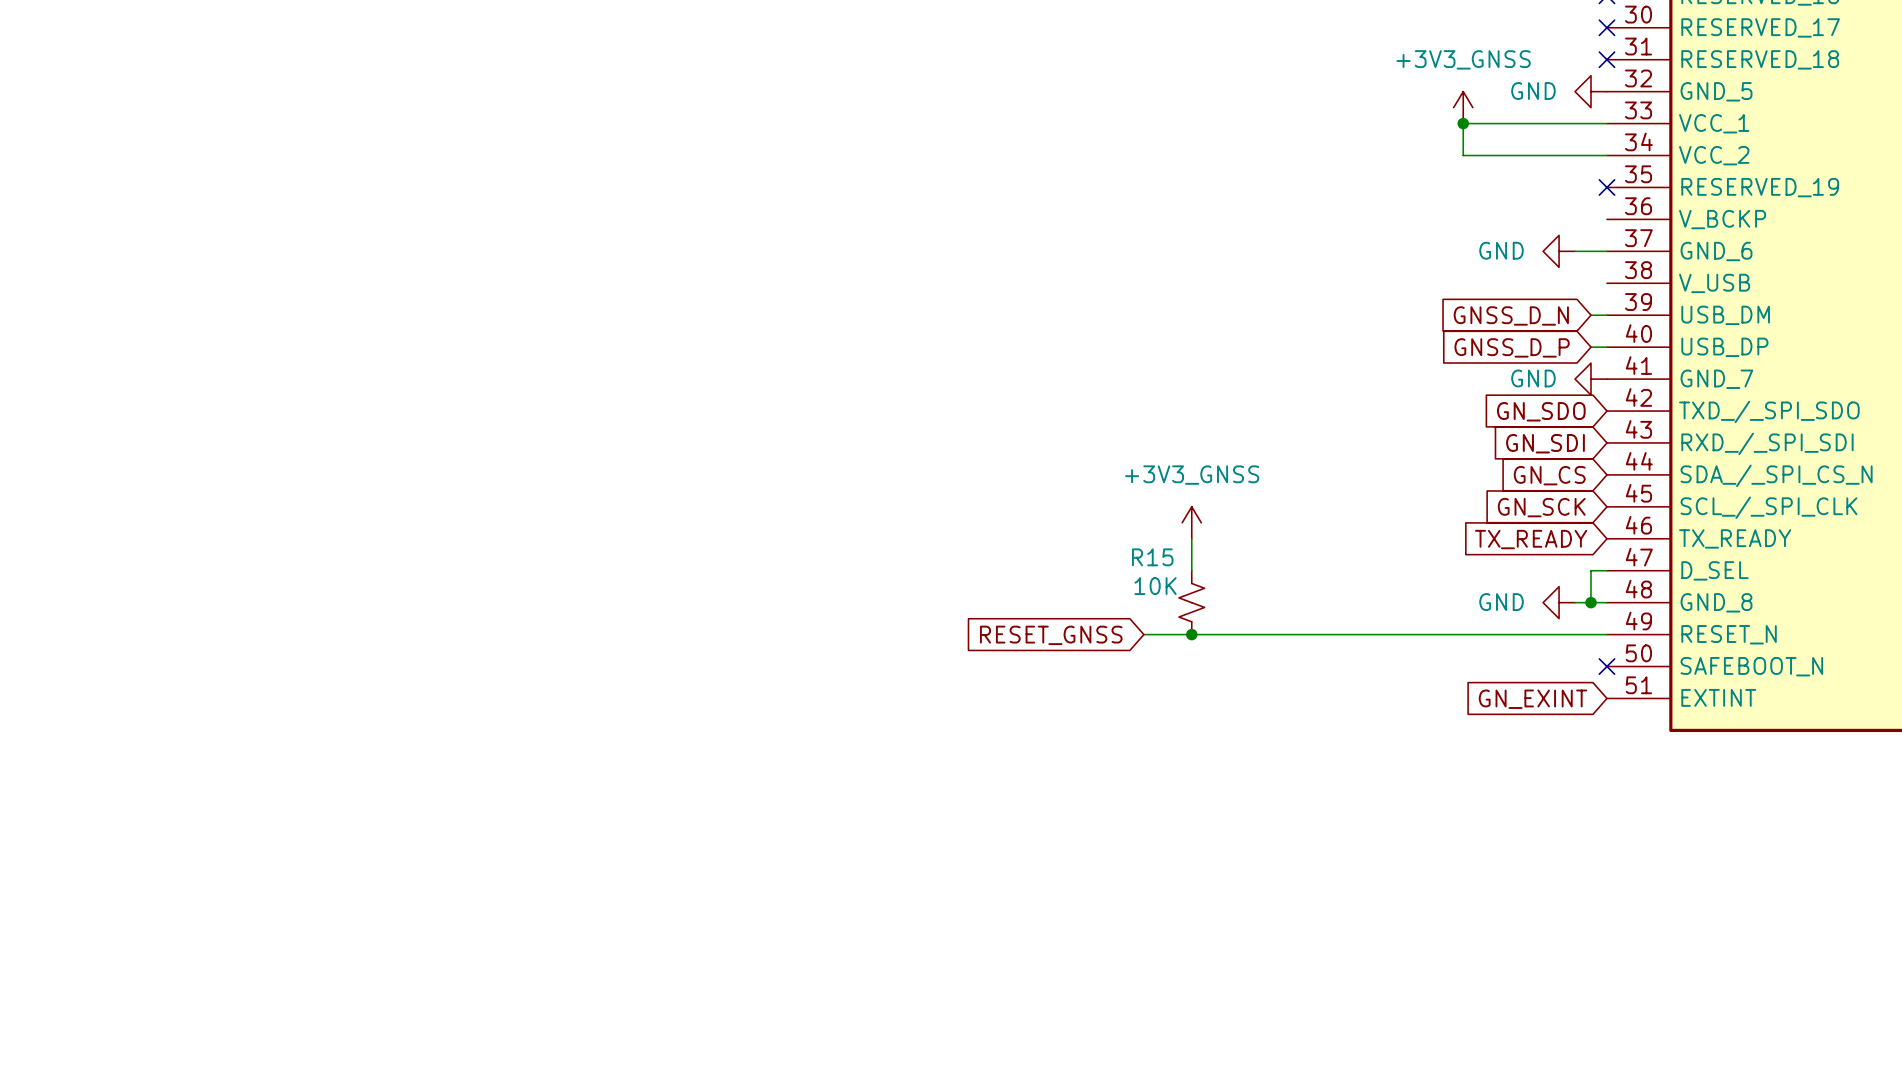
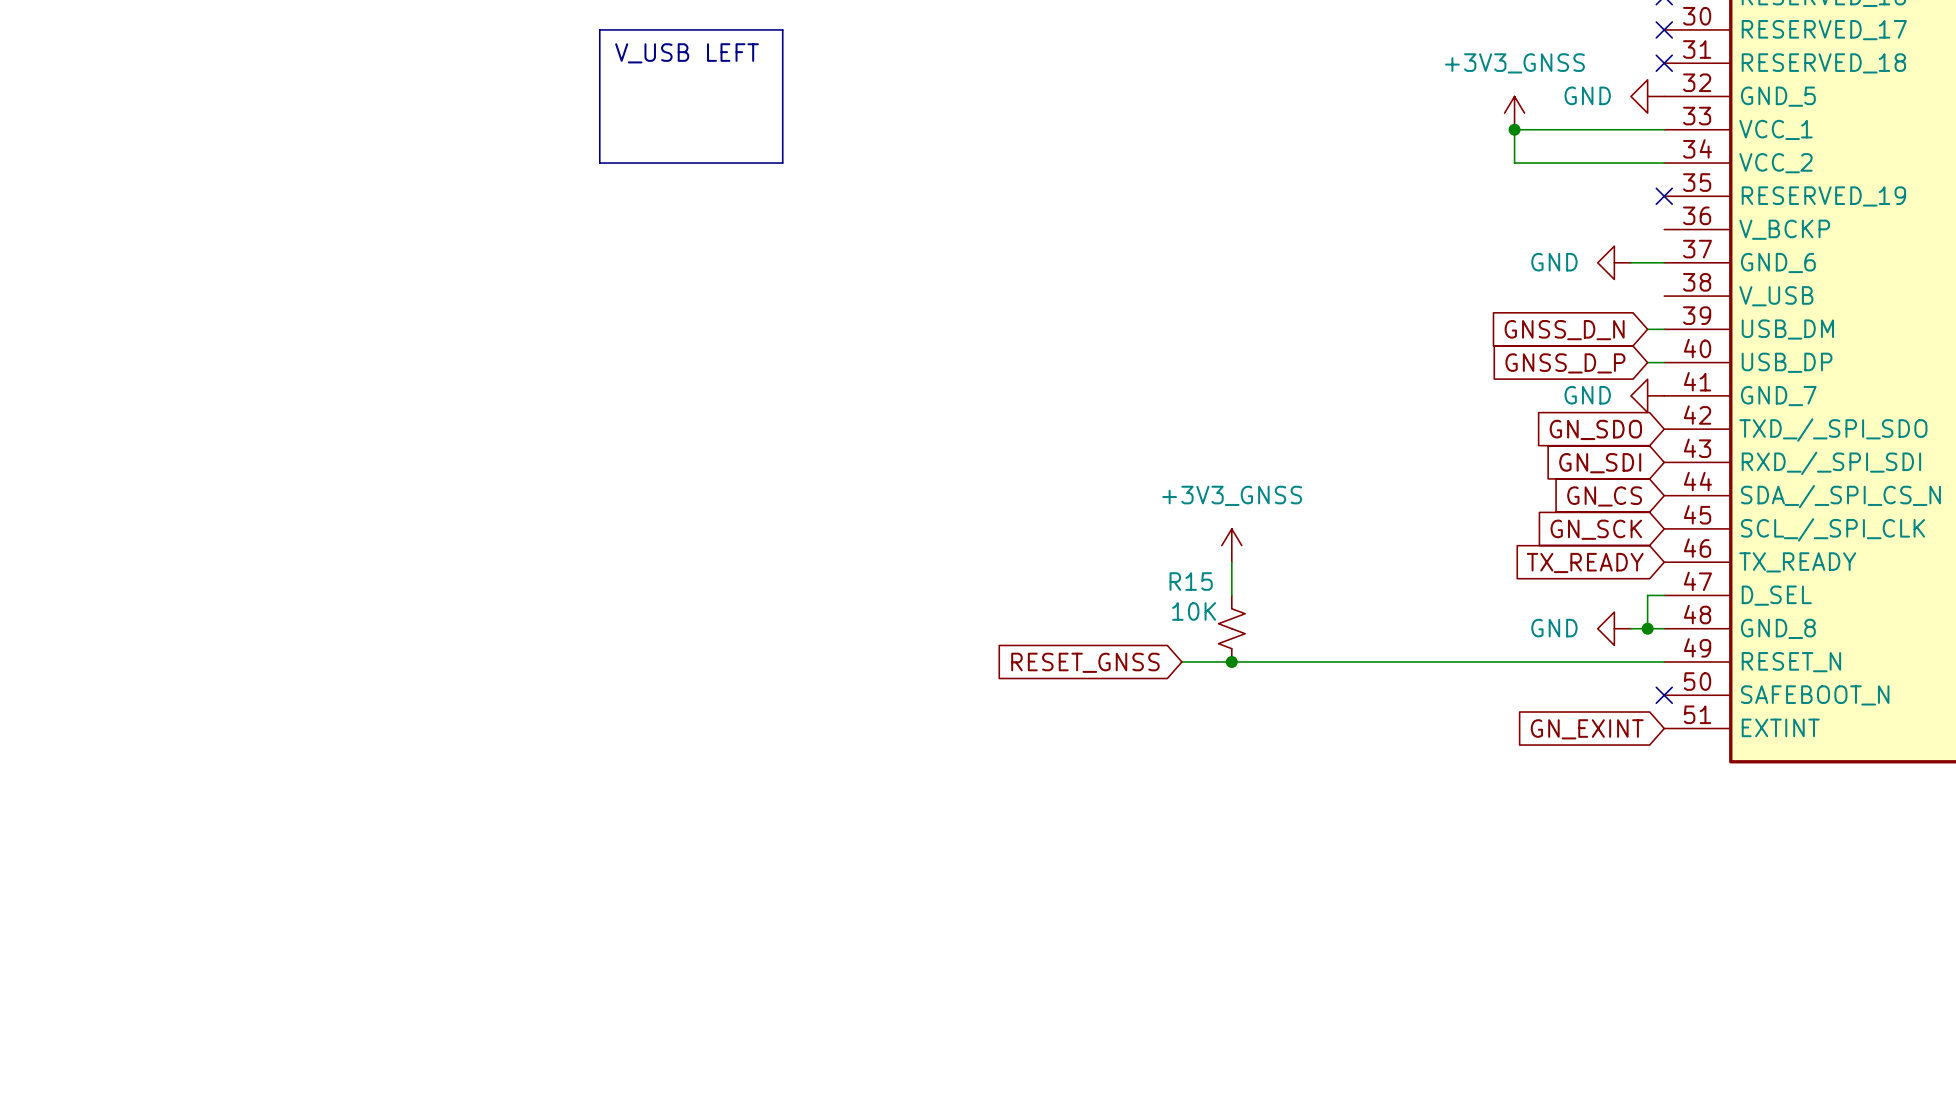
line: none -> (599, 29) (782, 29) (782, 163) (599, 163) (599, 29)
text: none -> V_USB LEFT (687, 53)

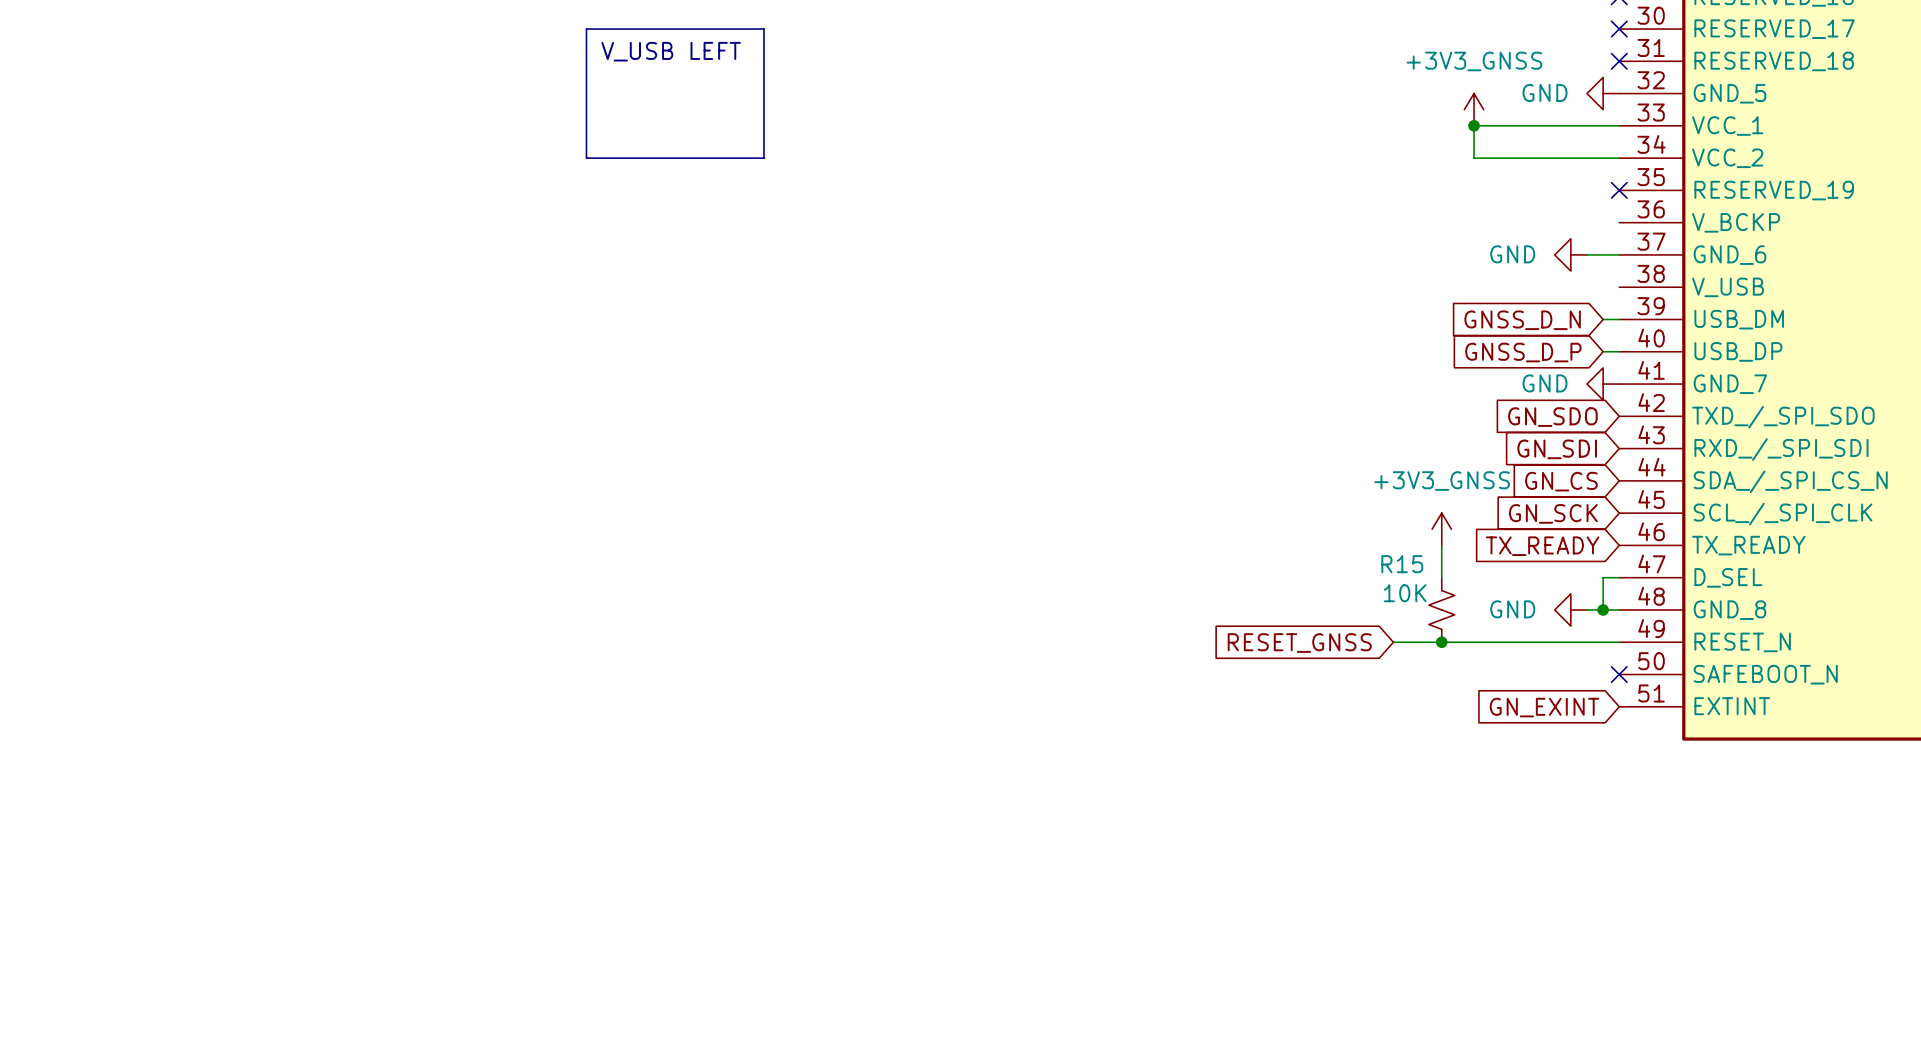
power symbol position: +3V3_GNSS (1231, 545) -> +3V3_GNSS (1441, 529)
wire: (1231, 562) (1231, 595) -> (1441, 545) (1441, 577)
R15 position: (1231, 628) -> (1441, 609)
wire: (1181, 661) (1431, 661) -> none
junction: (1231, 661) -> none
junction: none -> (1441, 642)
global label position: RESET_GNSS (1085, 662) -> RESET_GNSS (1299, 643)

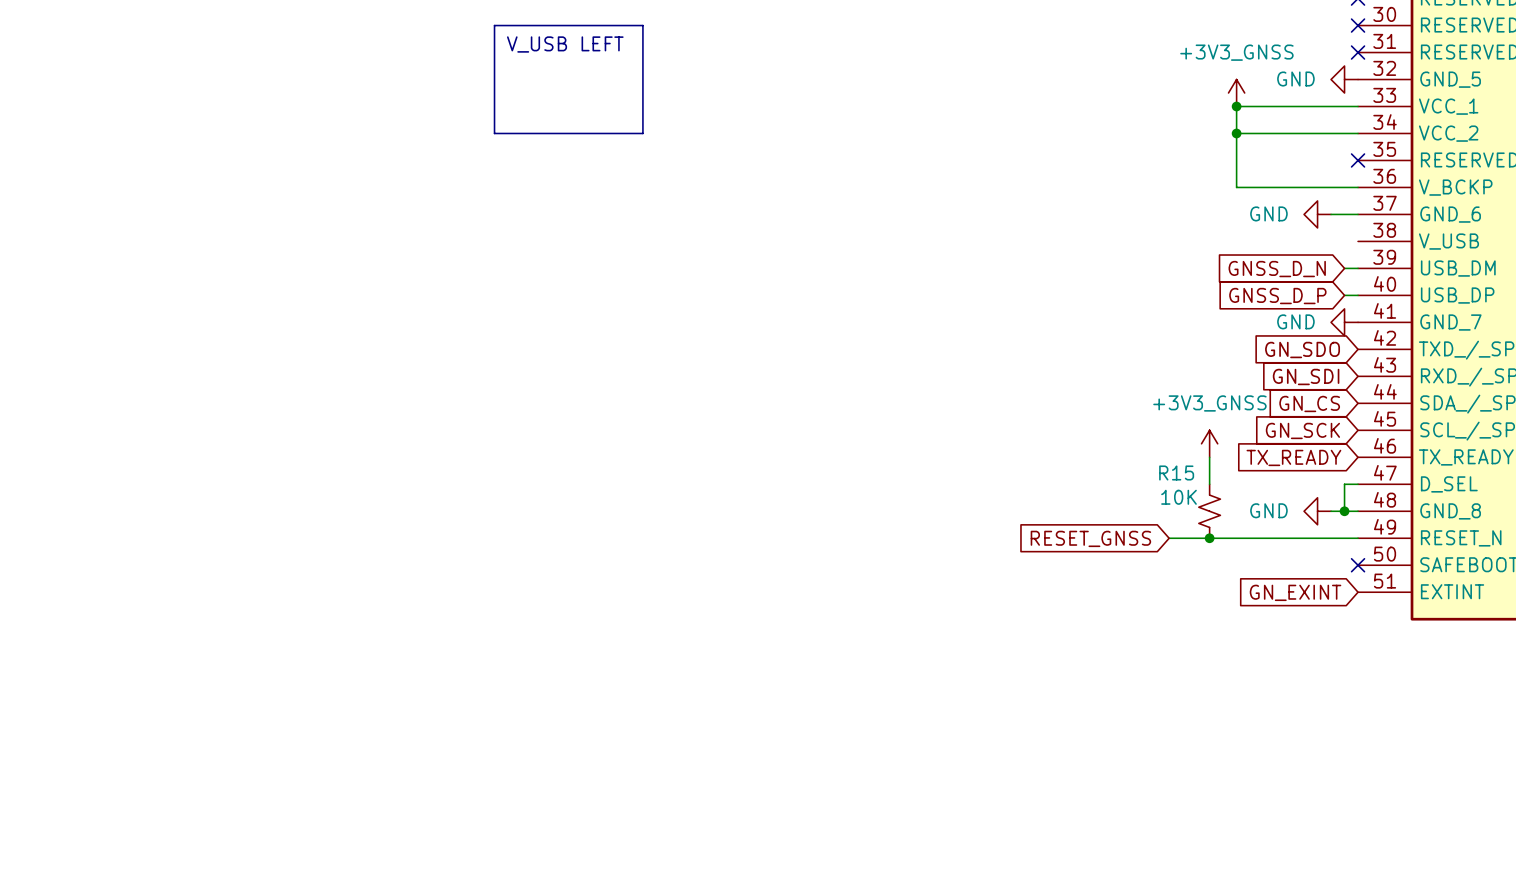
wire: none -> (1236, 133) (1236, 187) (1358, 187)
junction: none -> (1236, 133)

